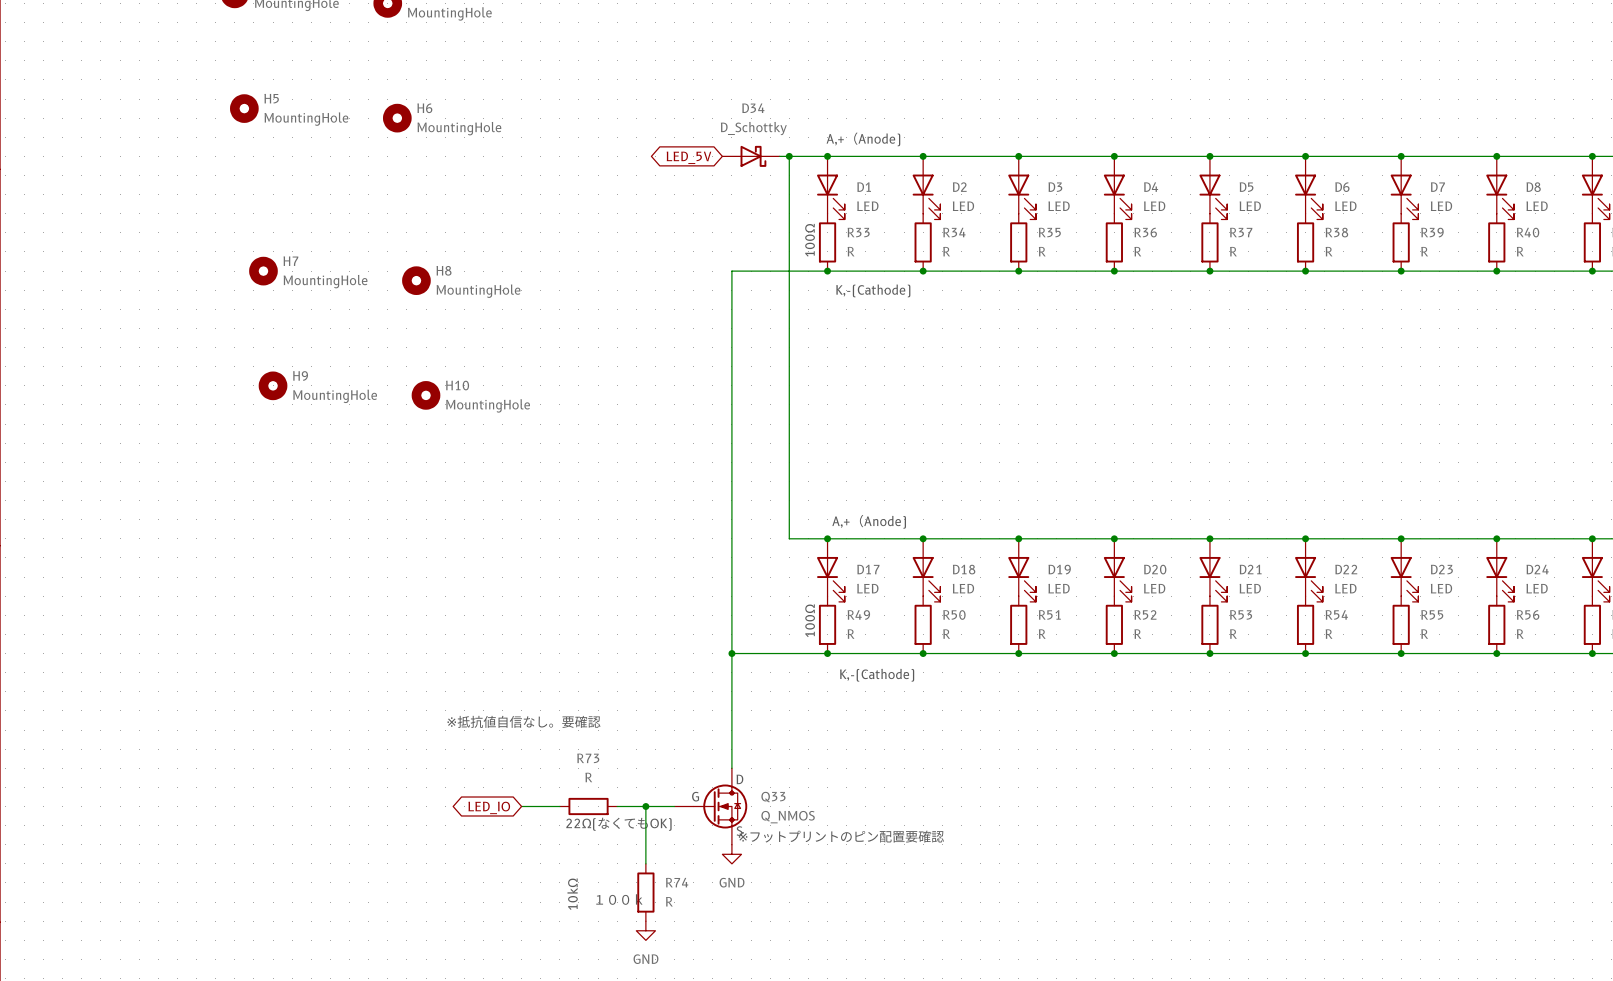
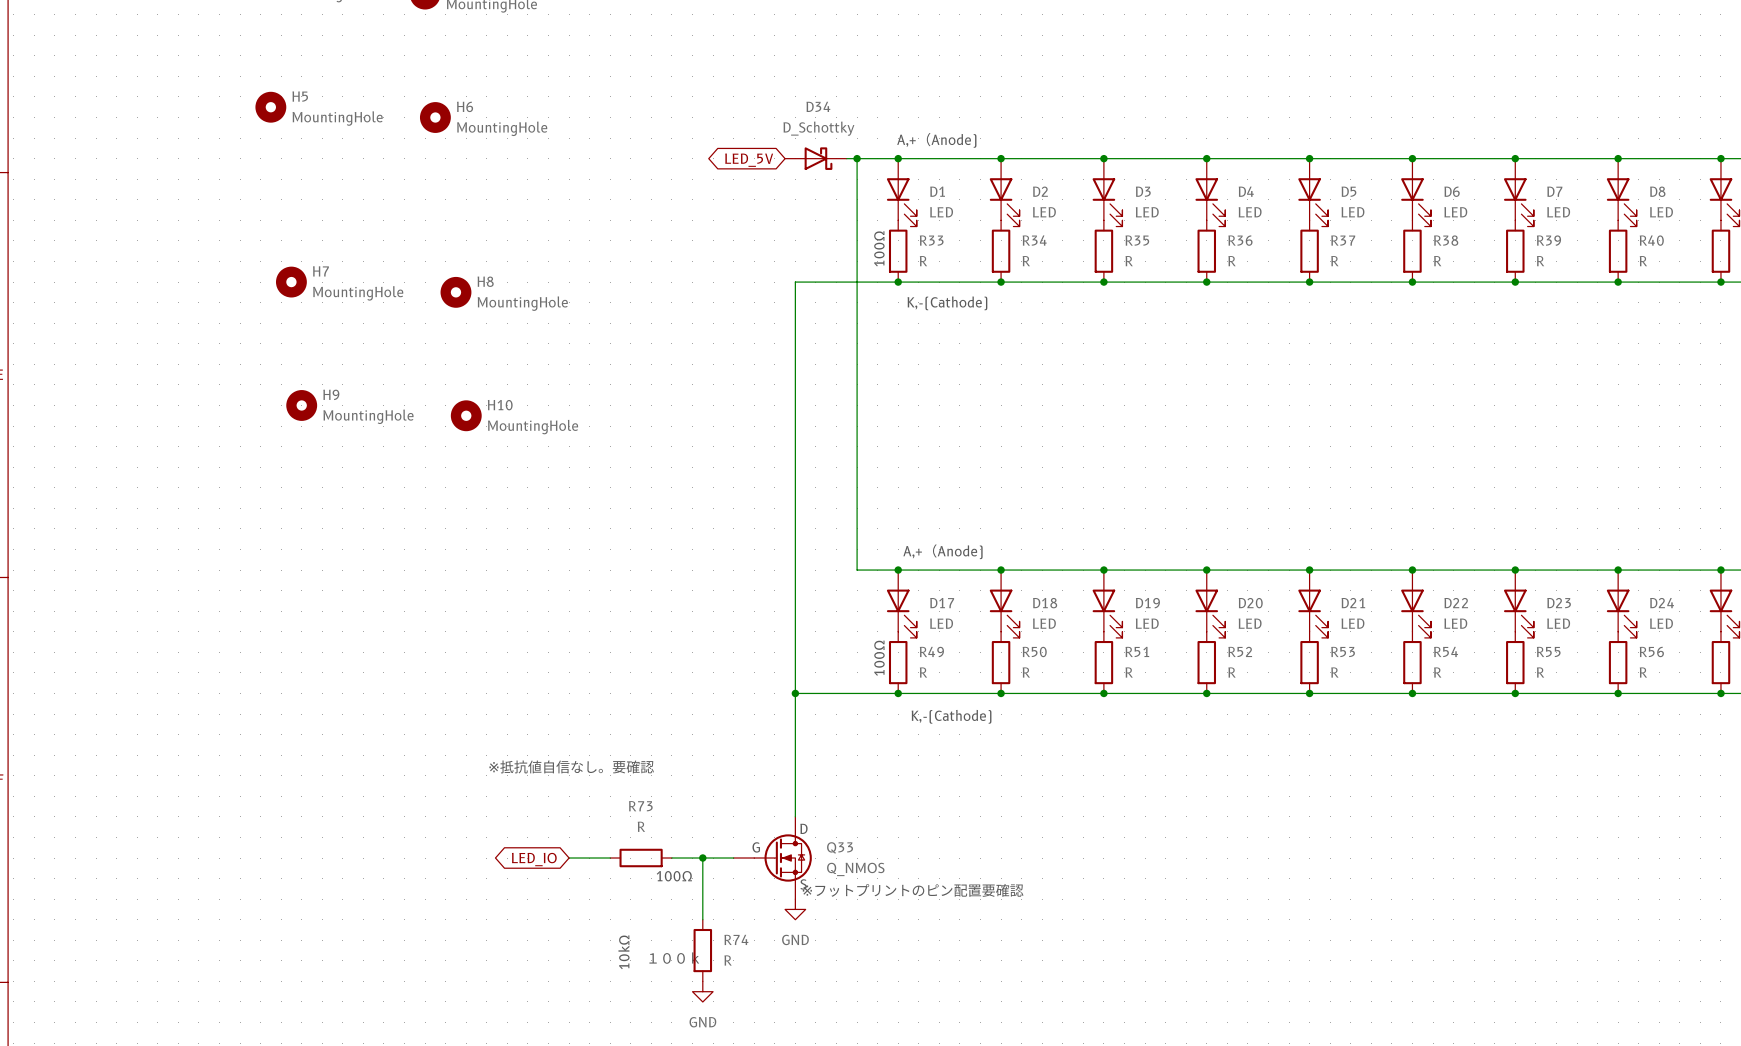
text: 22Ω(なくてもOK) (618, 824) -> 100Ω (674, 876)

